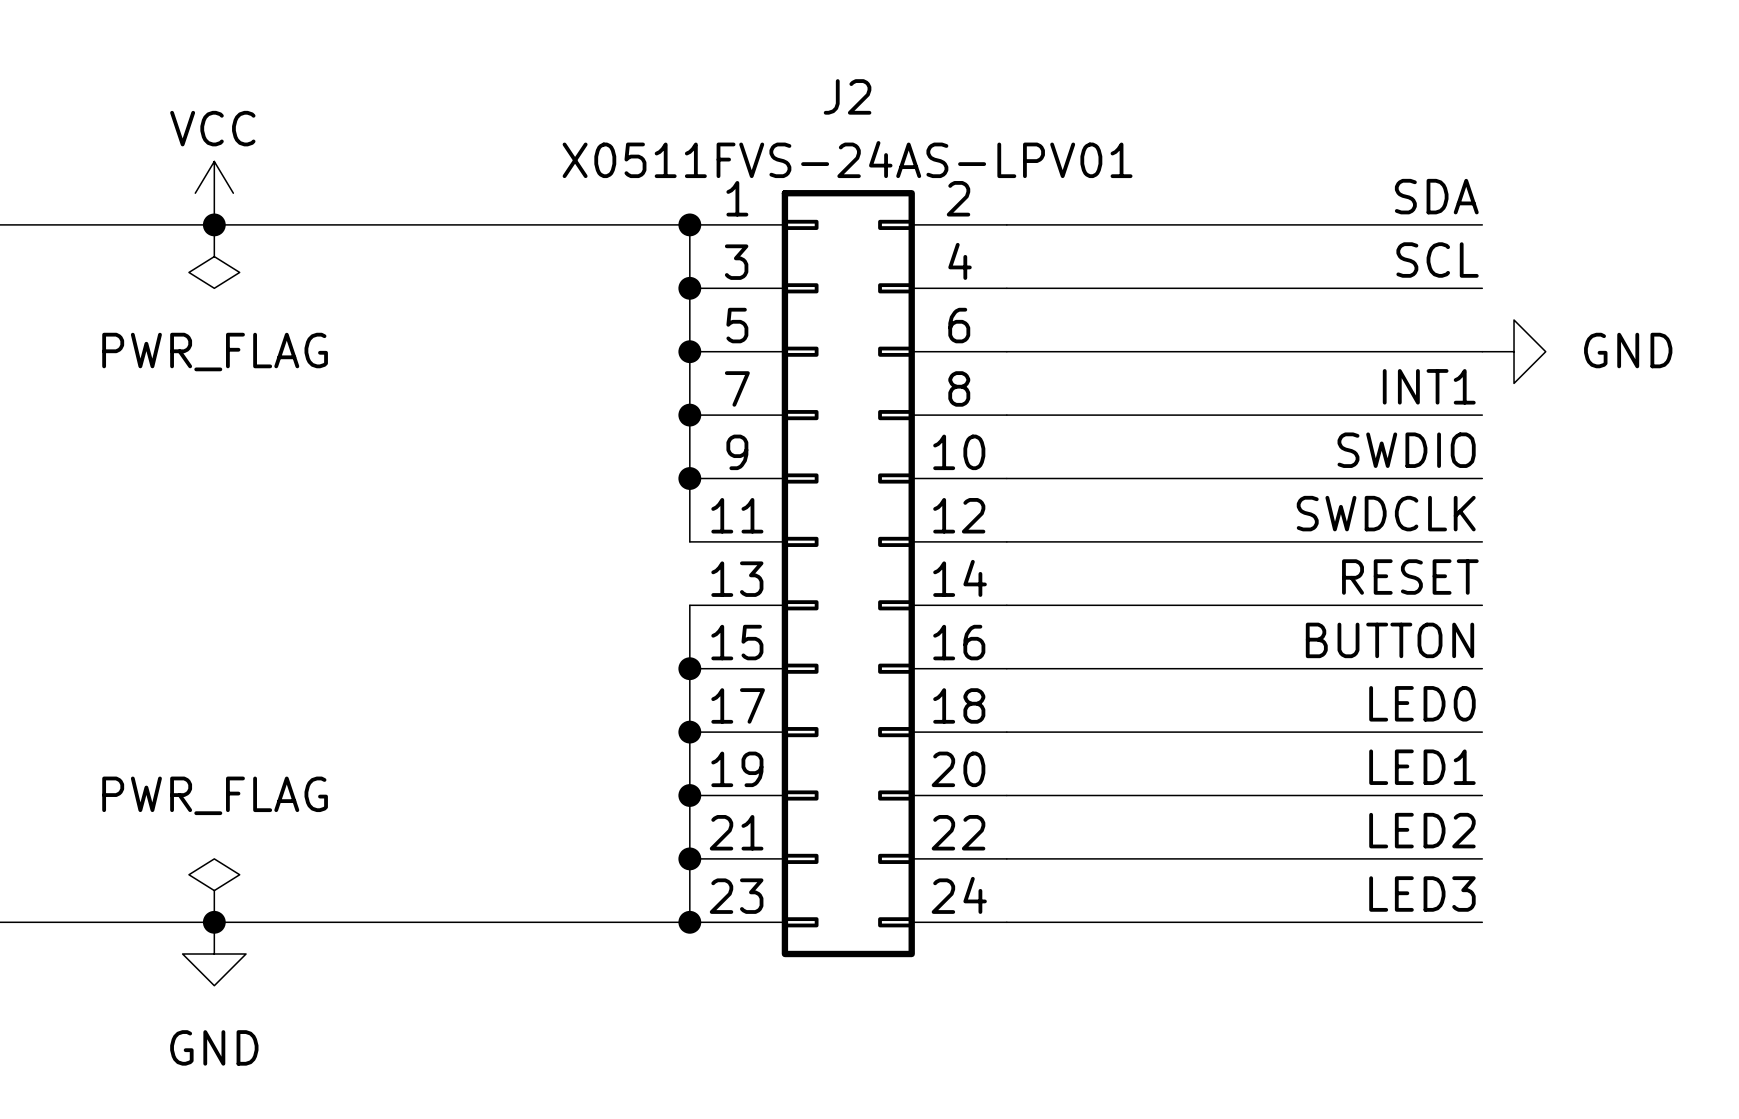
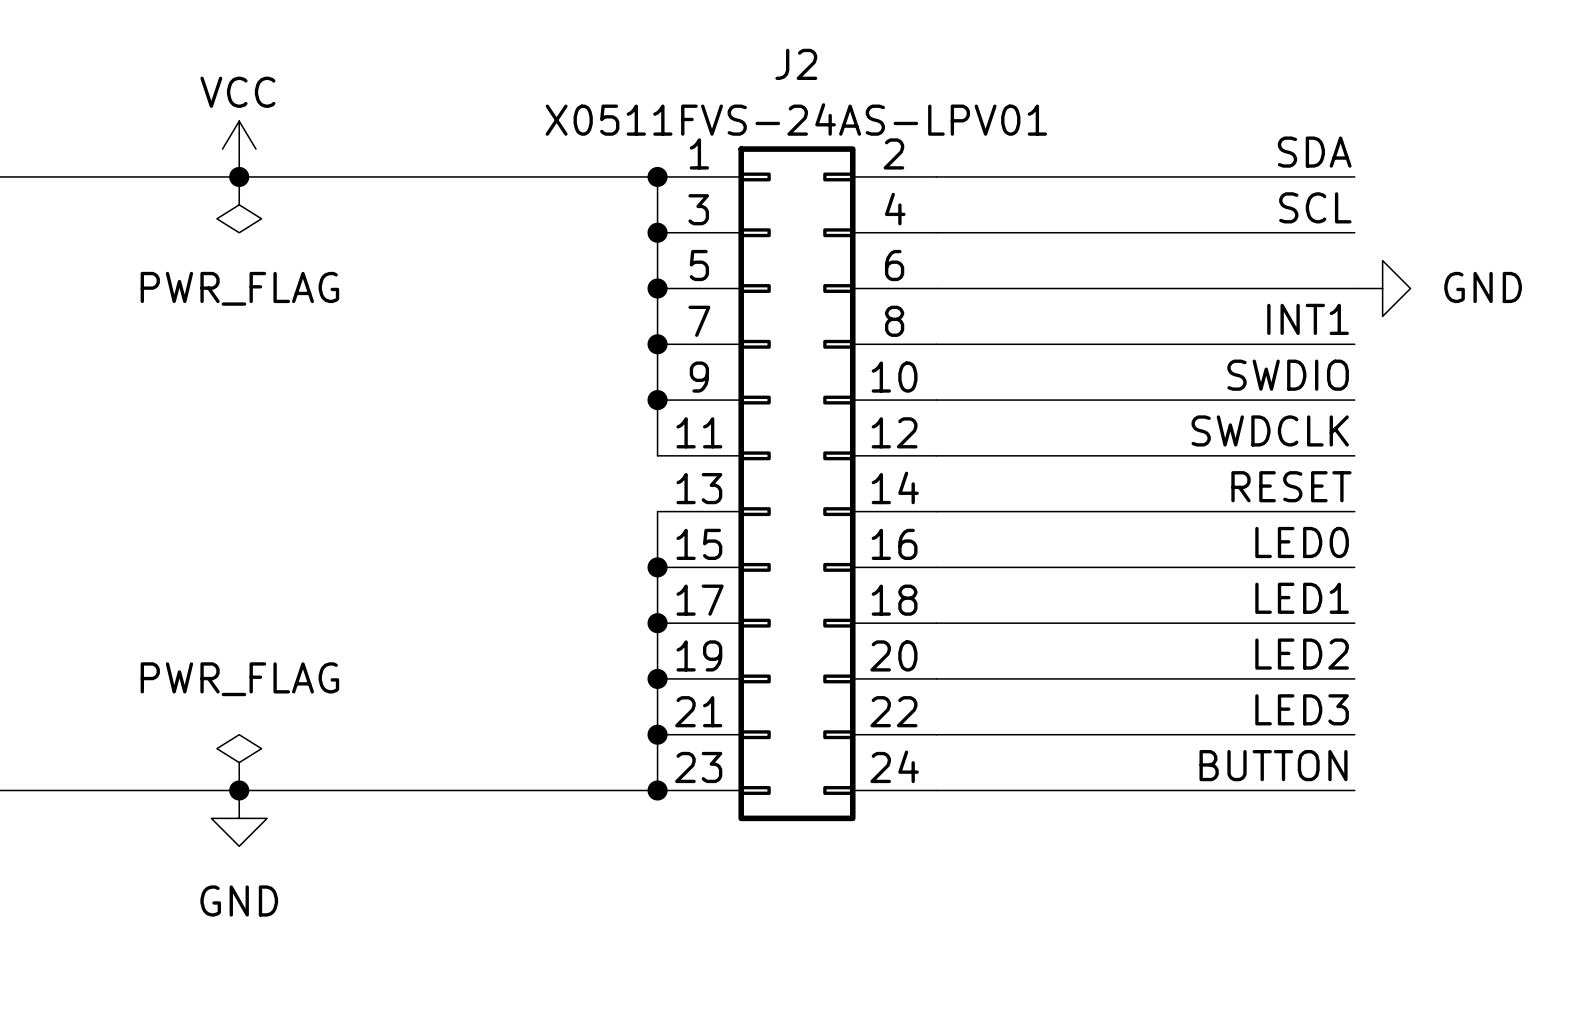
label: BUTTON (1389, 640) -> LED0 (1302, 542)
label: LED0 (1422, 703) -> LED1 (1302, 598)
label: LED1 (1422, 767) -> LED2 (1302, 654)
label: LED2 (1422, 830) -> LED3 (1302, 709)
label: LED3 (1422, 894) -> BUTTON (1273, 765)

